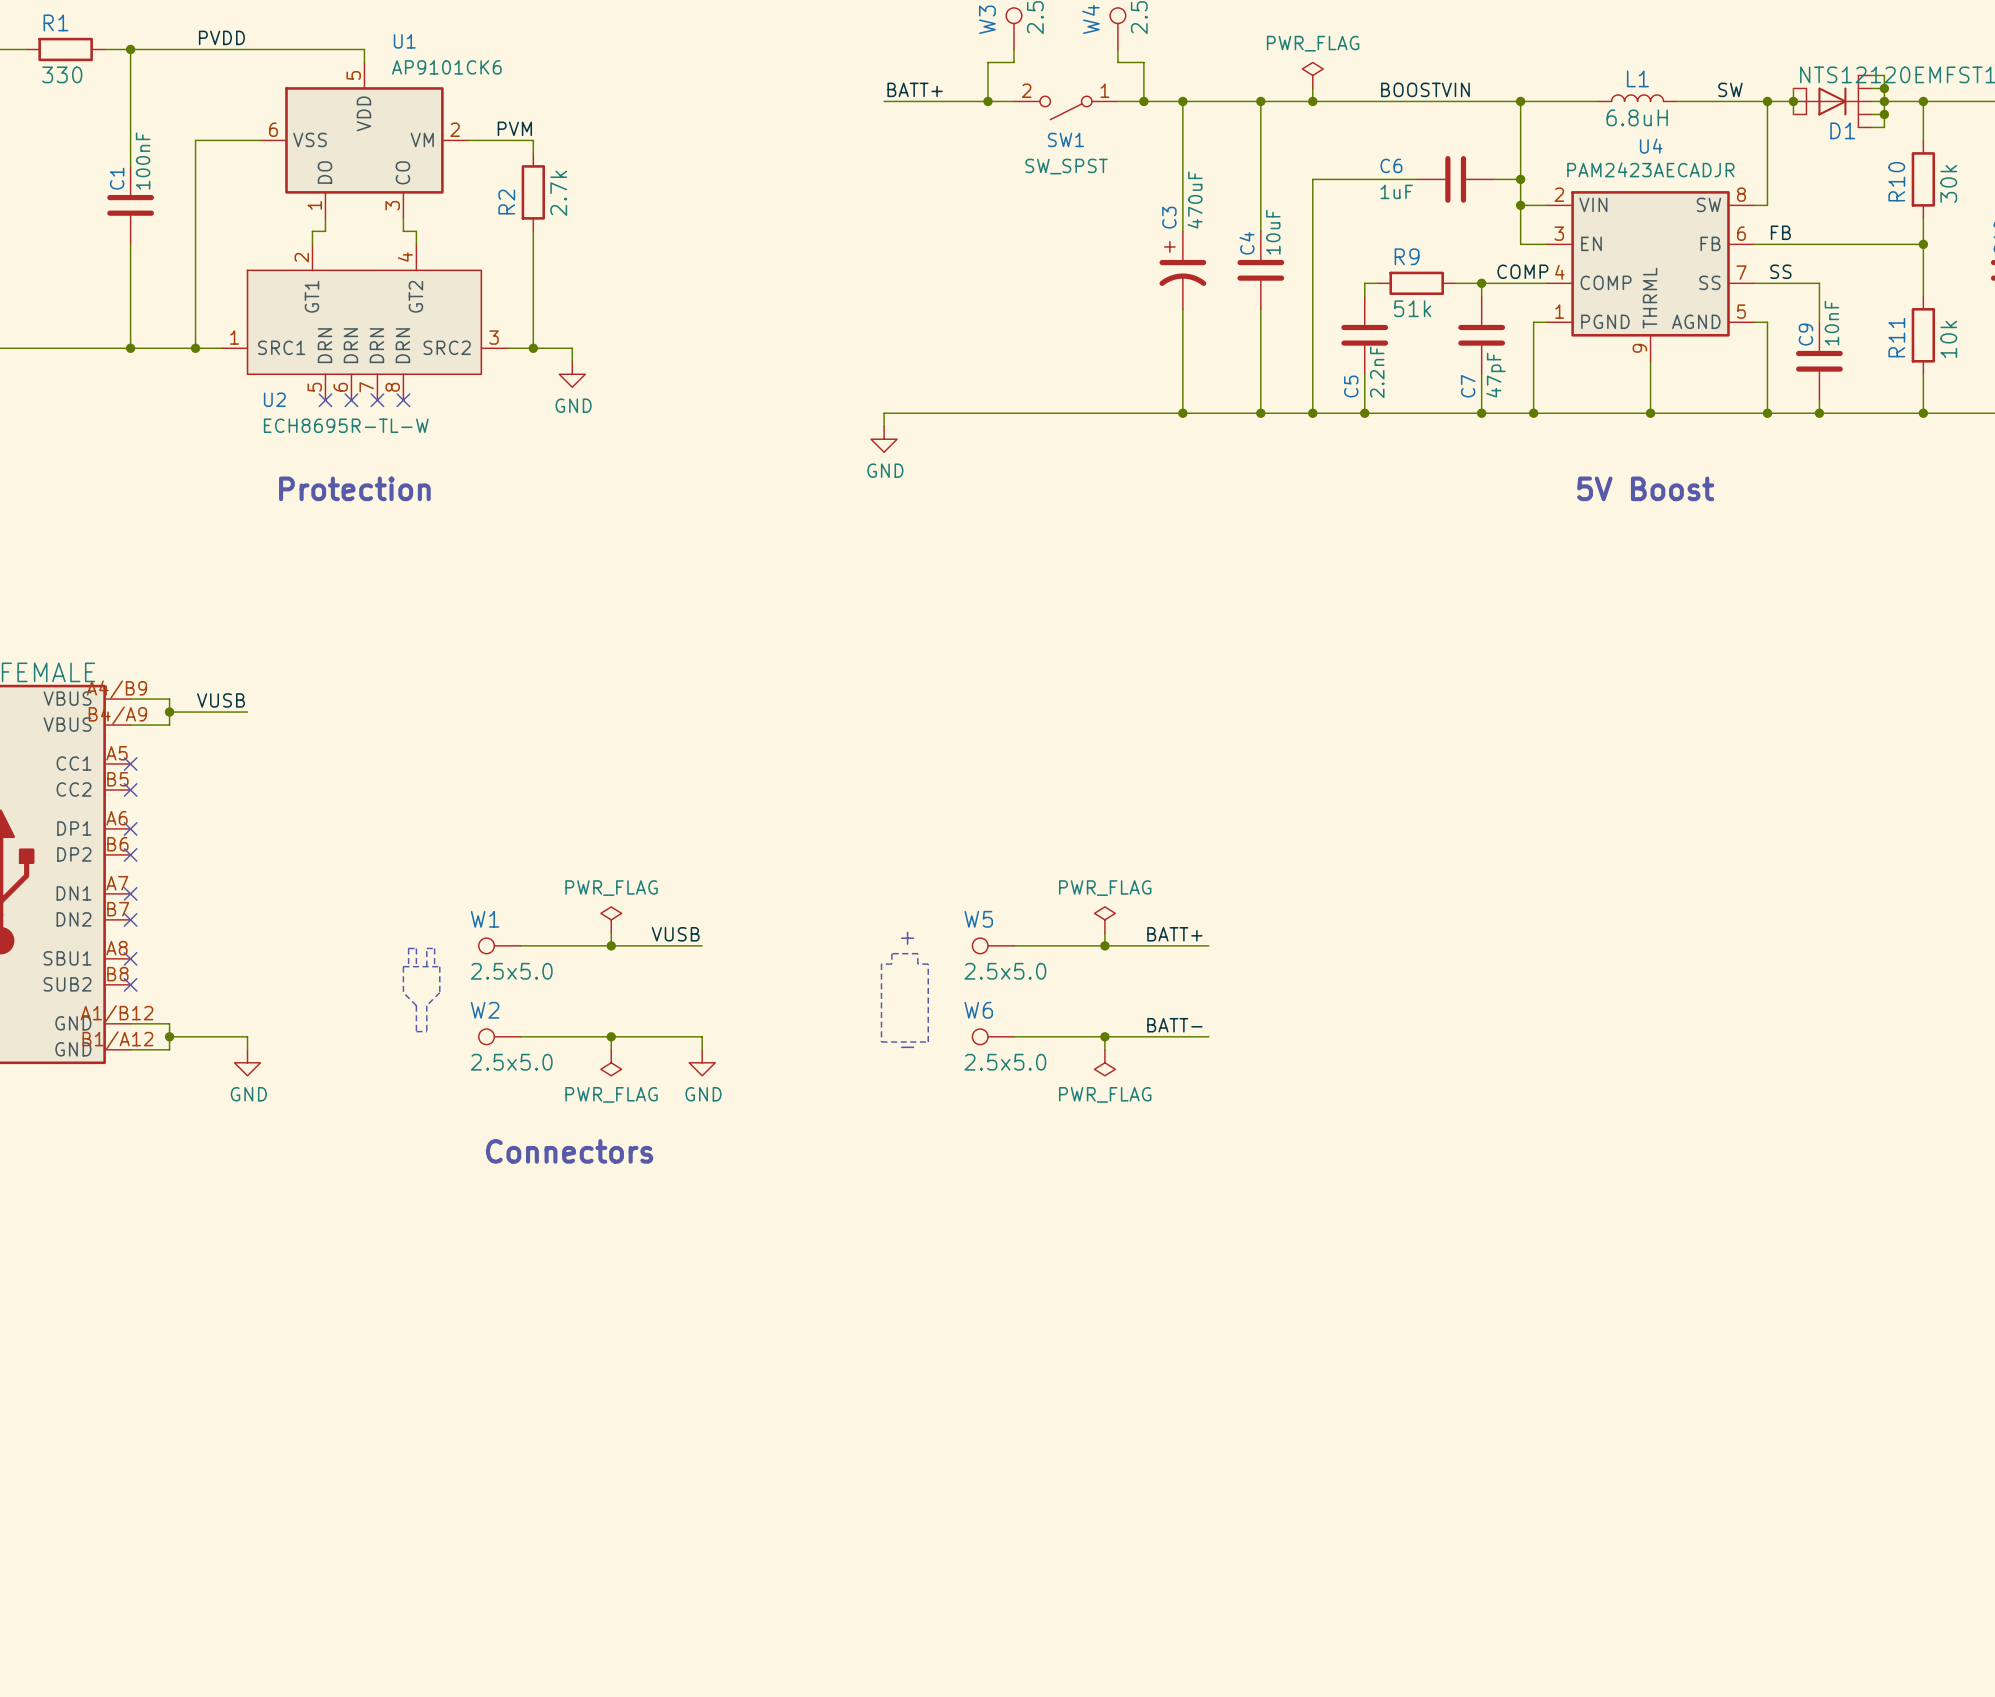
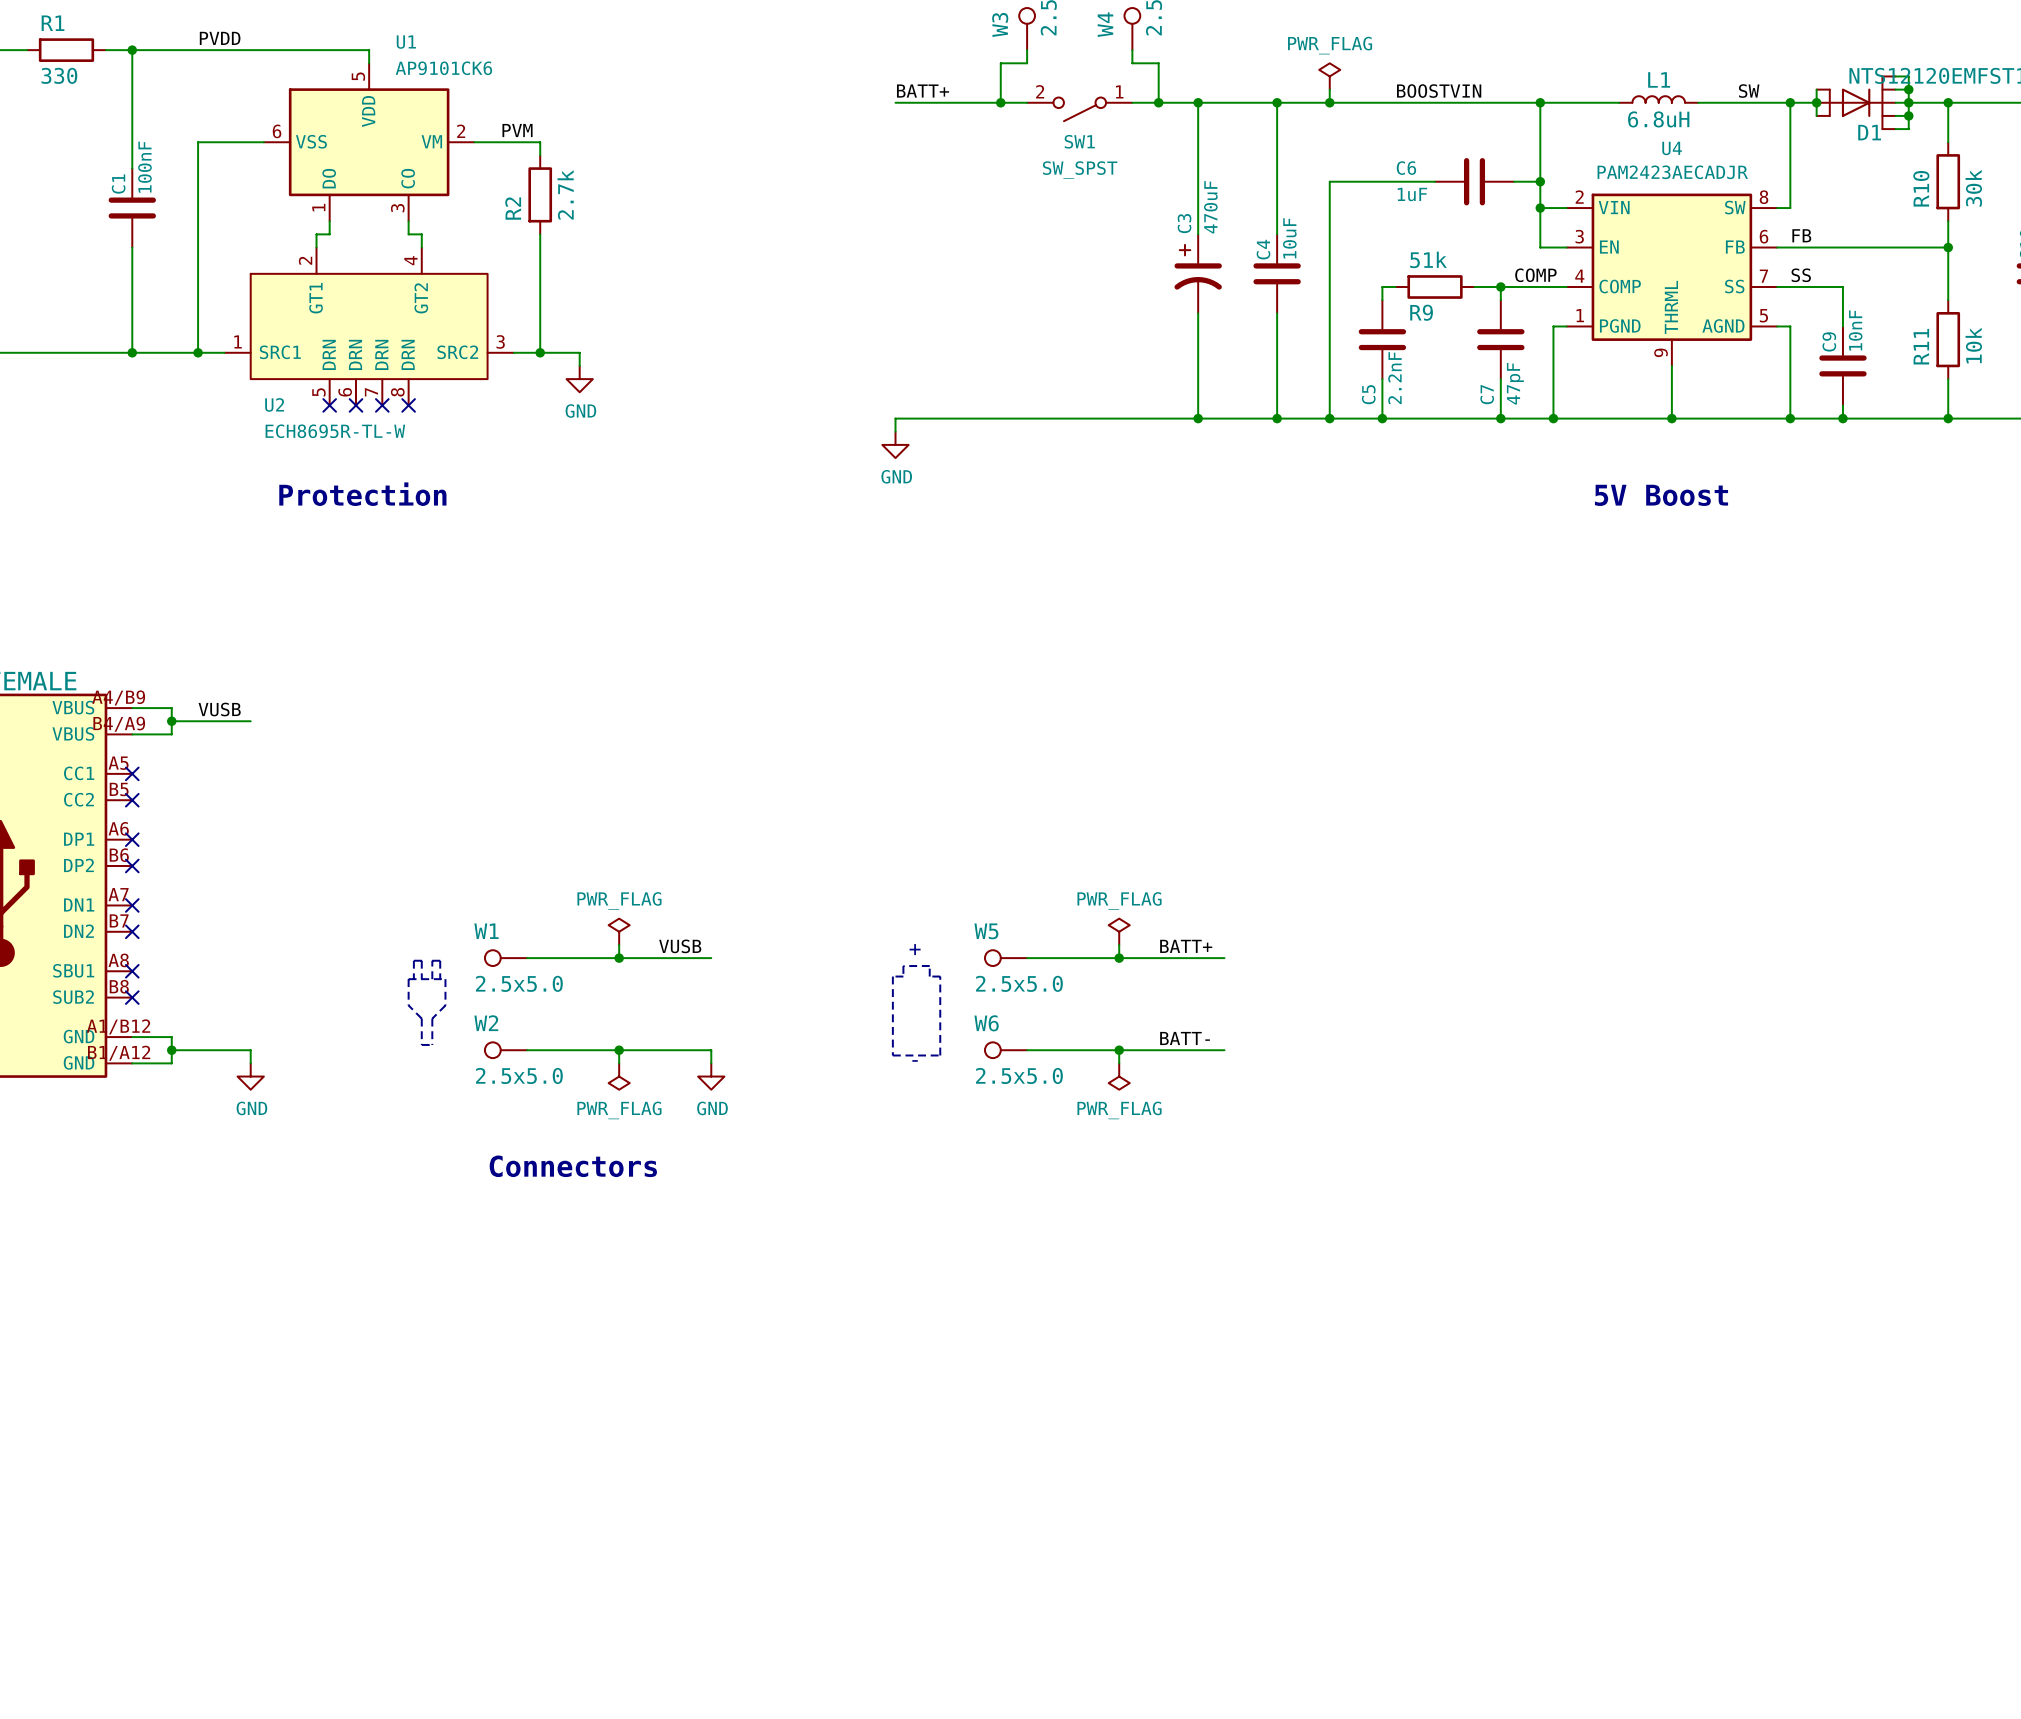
R9 name position: R9 (1407, 256) -> R9 (1421, 312)
R9 value position: 51k (1412, 308) -> 51k (1428, 259)

